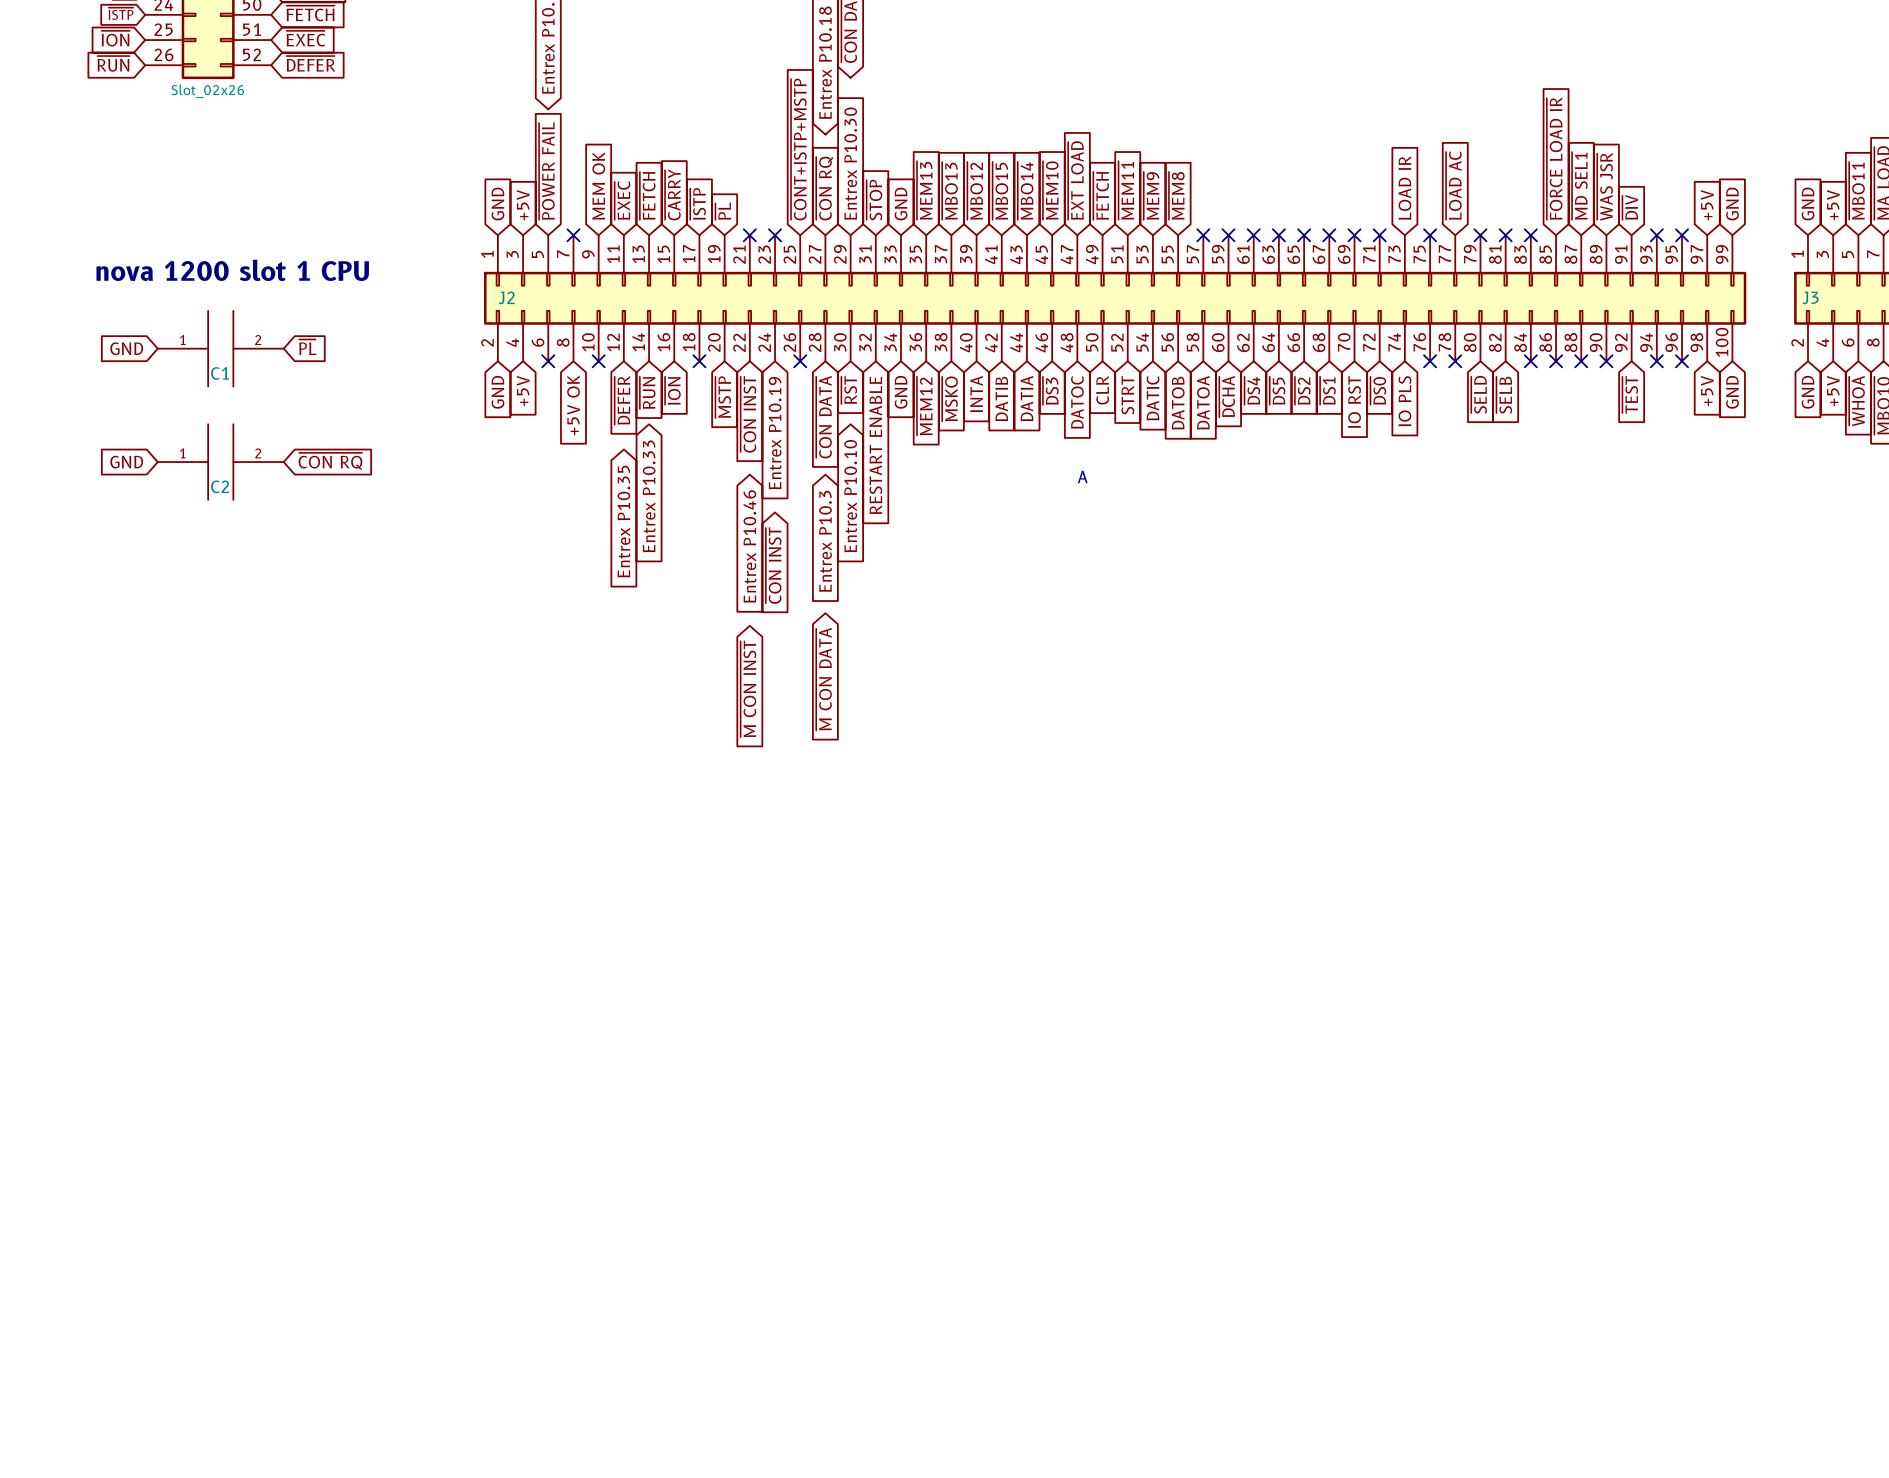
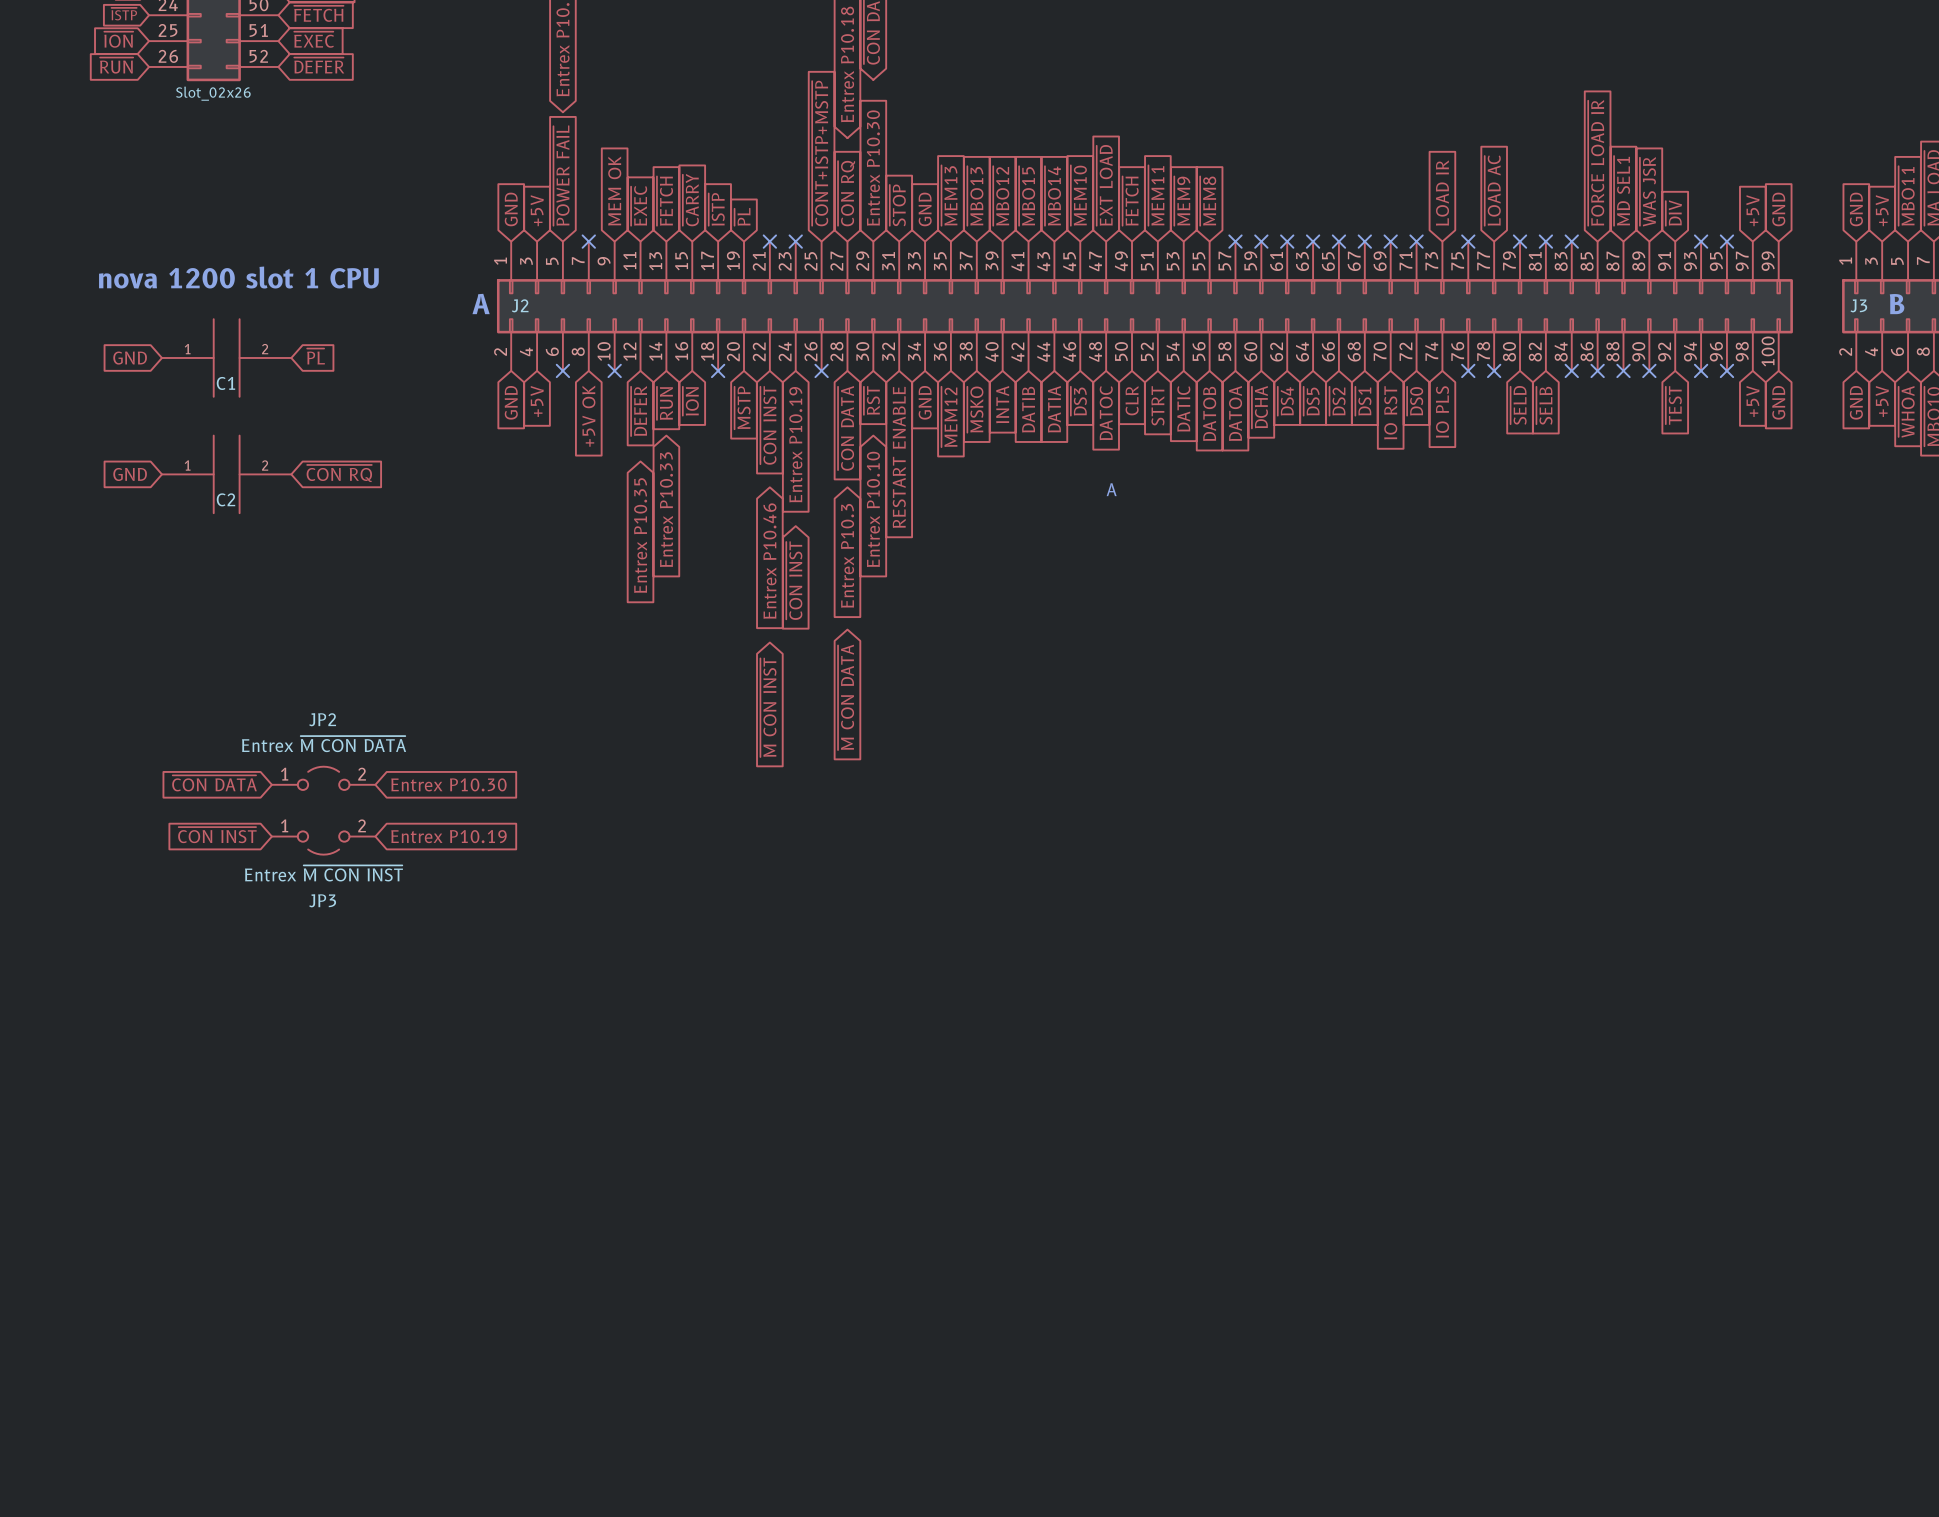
text: none -> A (481, 303)
text: none -> B (1897, 304)
JP2: none -> Entrex ~{M CON DATA} (323, 778)
global label: none -> ~{CON DATA} (214, 783)
global label: none -> Entrex P10.30 (448, 784)
global label: none -> ~{CON INST} (217, 835)
global label: none -> Entrex P10.19 (449, 836)
JP3: none -> Entrex ~{M CON INST} (323, 843)

